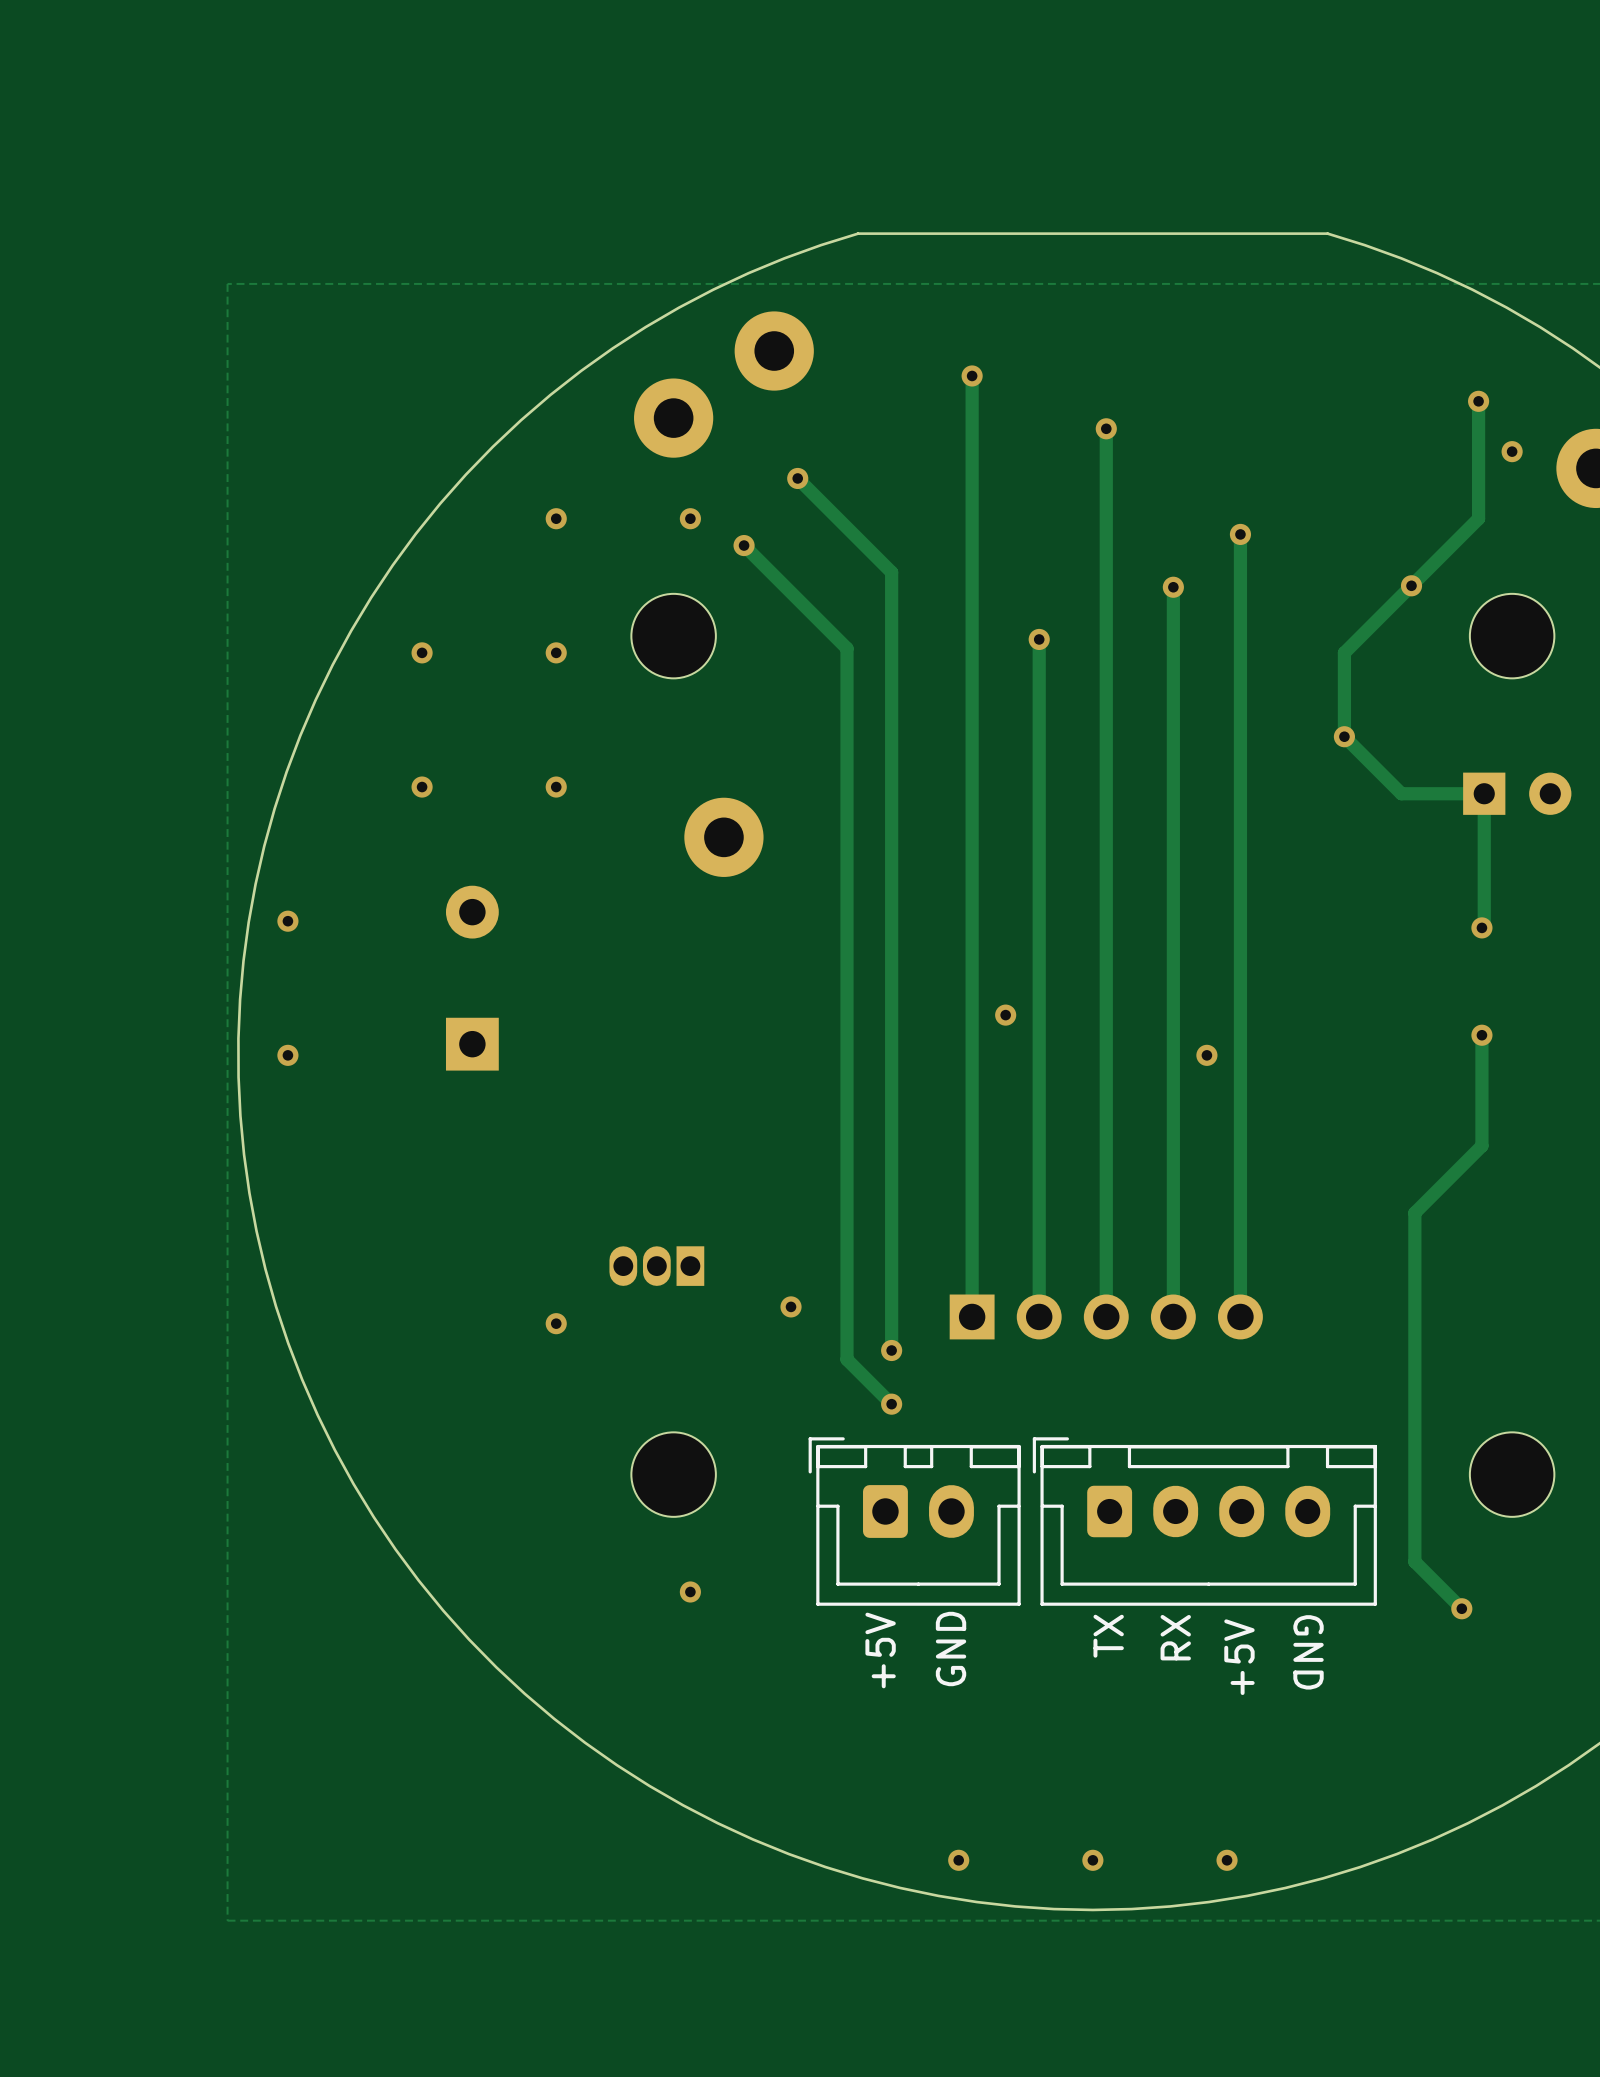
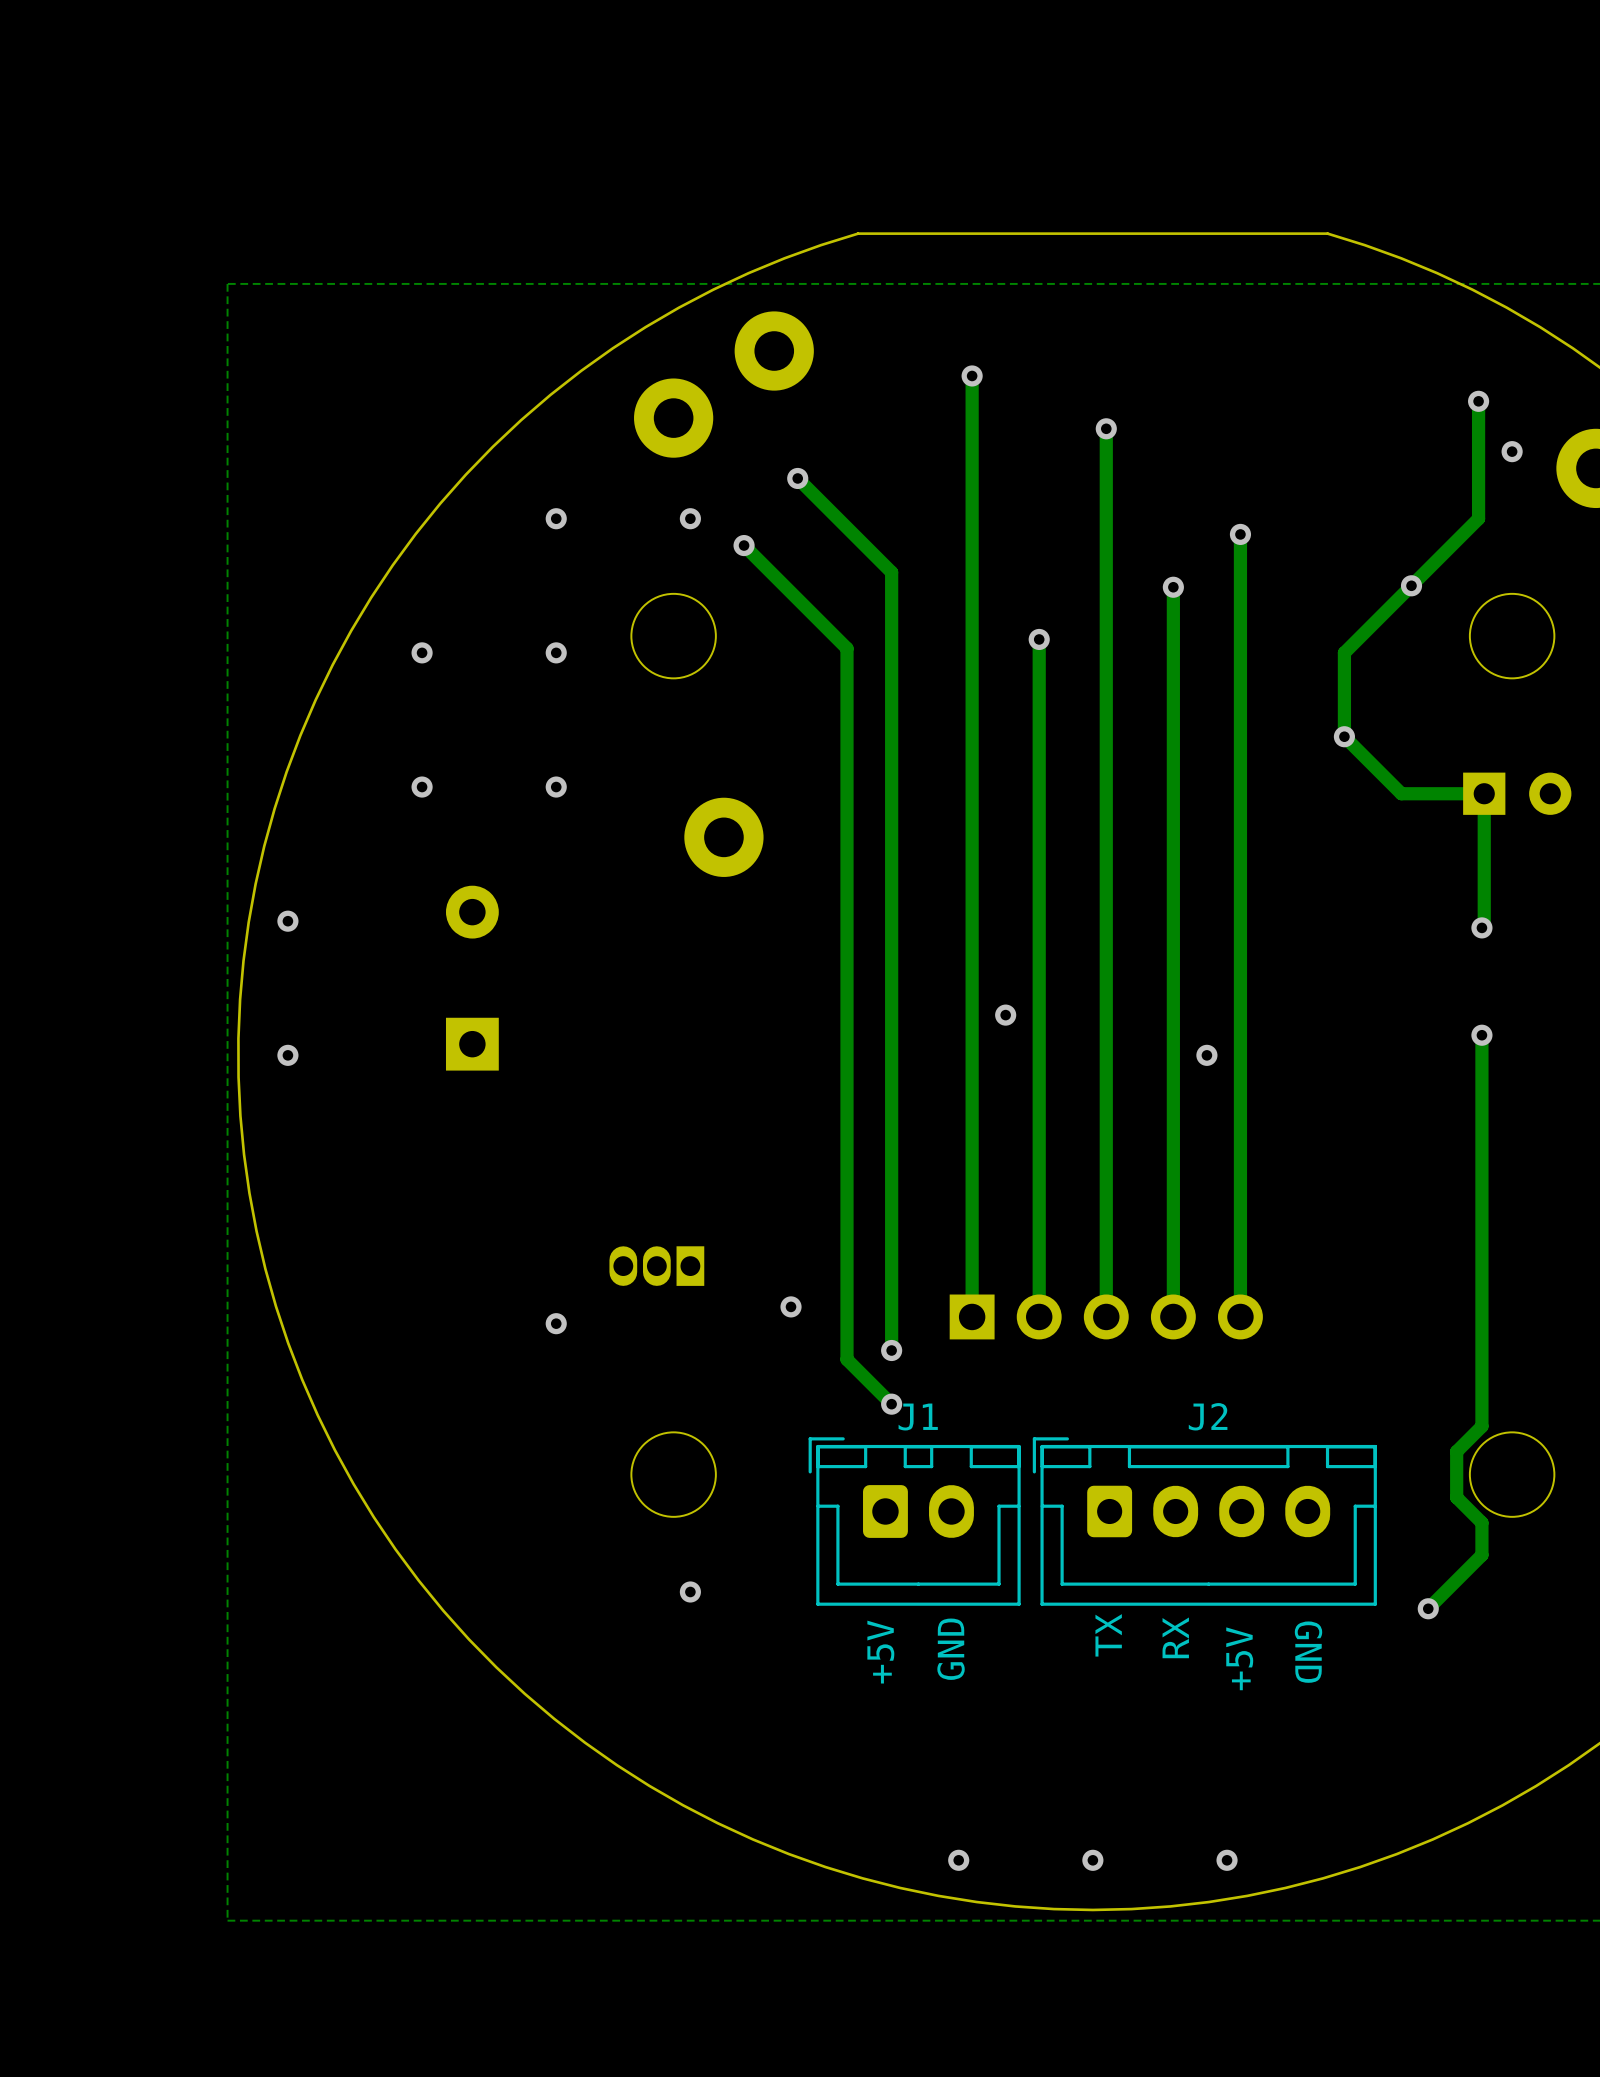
track: (1481, 1145) (1414, 1212) (1414, 1561) (1461, 1608) -> (1481, 1145) (1481, 1426) (1456, 1451) (1456, 1497) (1481, 1522) (1481, 1555) (1428, 1608)
J1 name: none -> J1 (918, 1417)
J2 name: none -> J2 (1208, 1416)
via position: (1461, 1608) -> (1428, 1608)

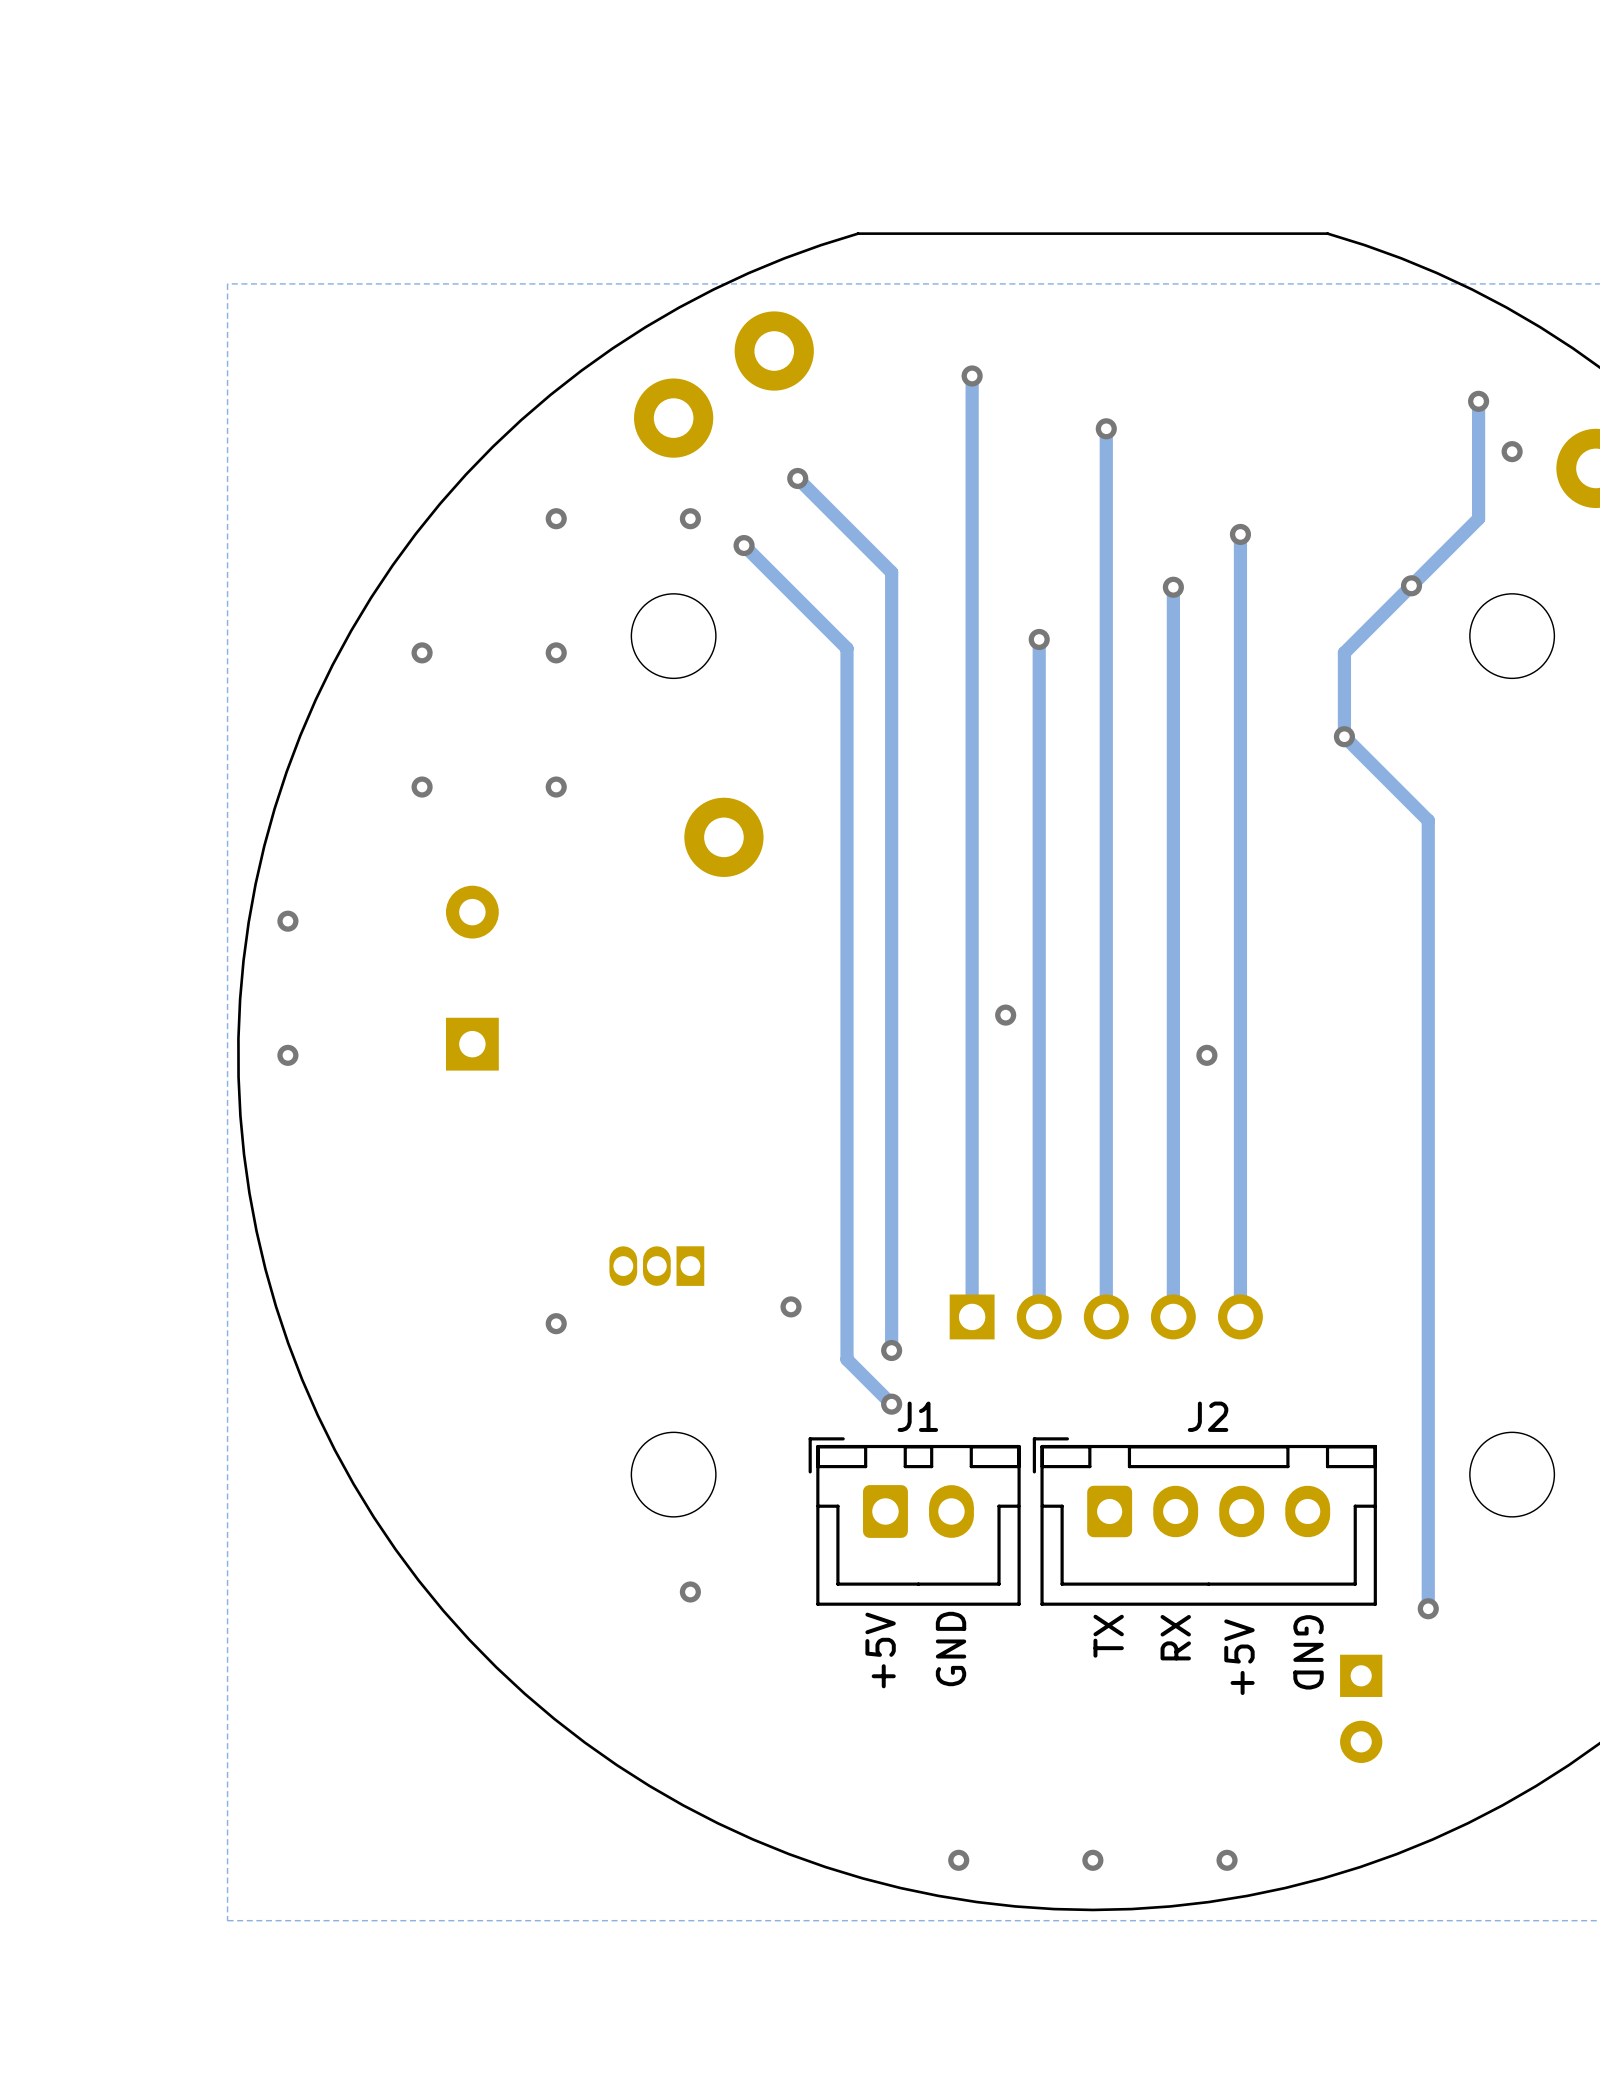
track: (1484, 793) (1484, 925) (1481, 927) -> none
track: (1484, 793) (1401, 793) -> none
part: (1517, 793) -> none
via: (1481, 927) -> none
track: (1481, 1035) (1481, 1426) (1456, 1451) (1456, 1497) (1481, 1522) (1481, 1555) (1428, 1608) -> (1401, 793) (1428, 820) (1428, 1608)
via: (1481, 1035) -> none
part: none -> (1361, 1708)

